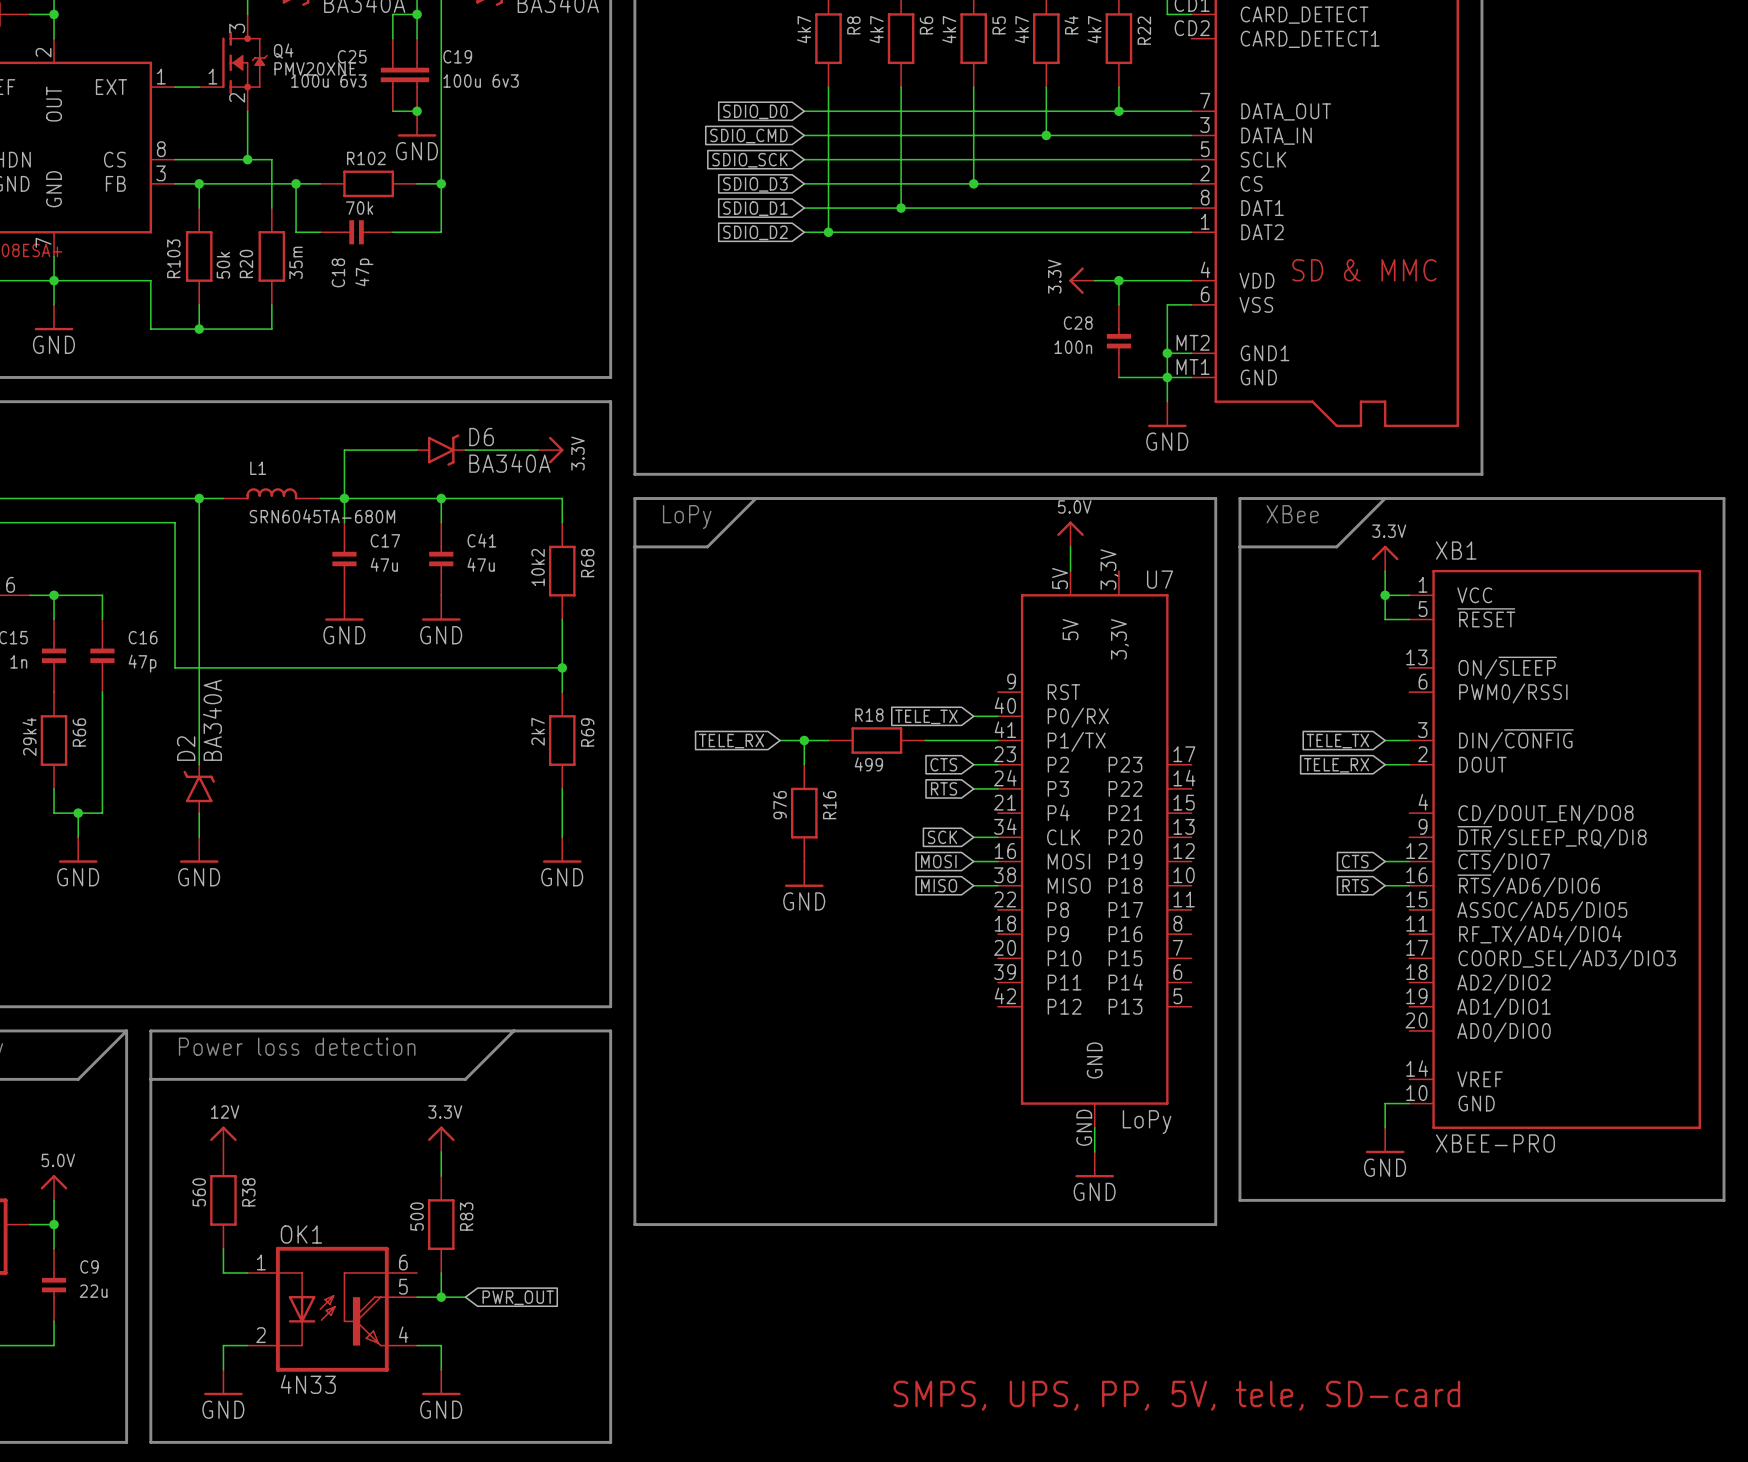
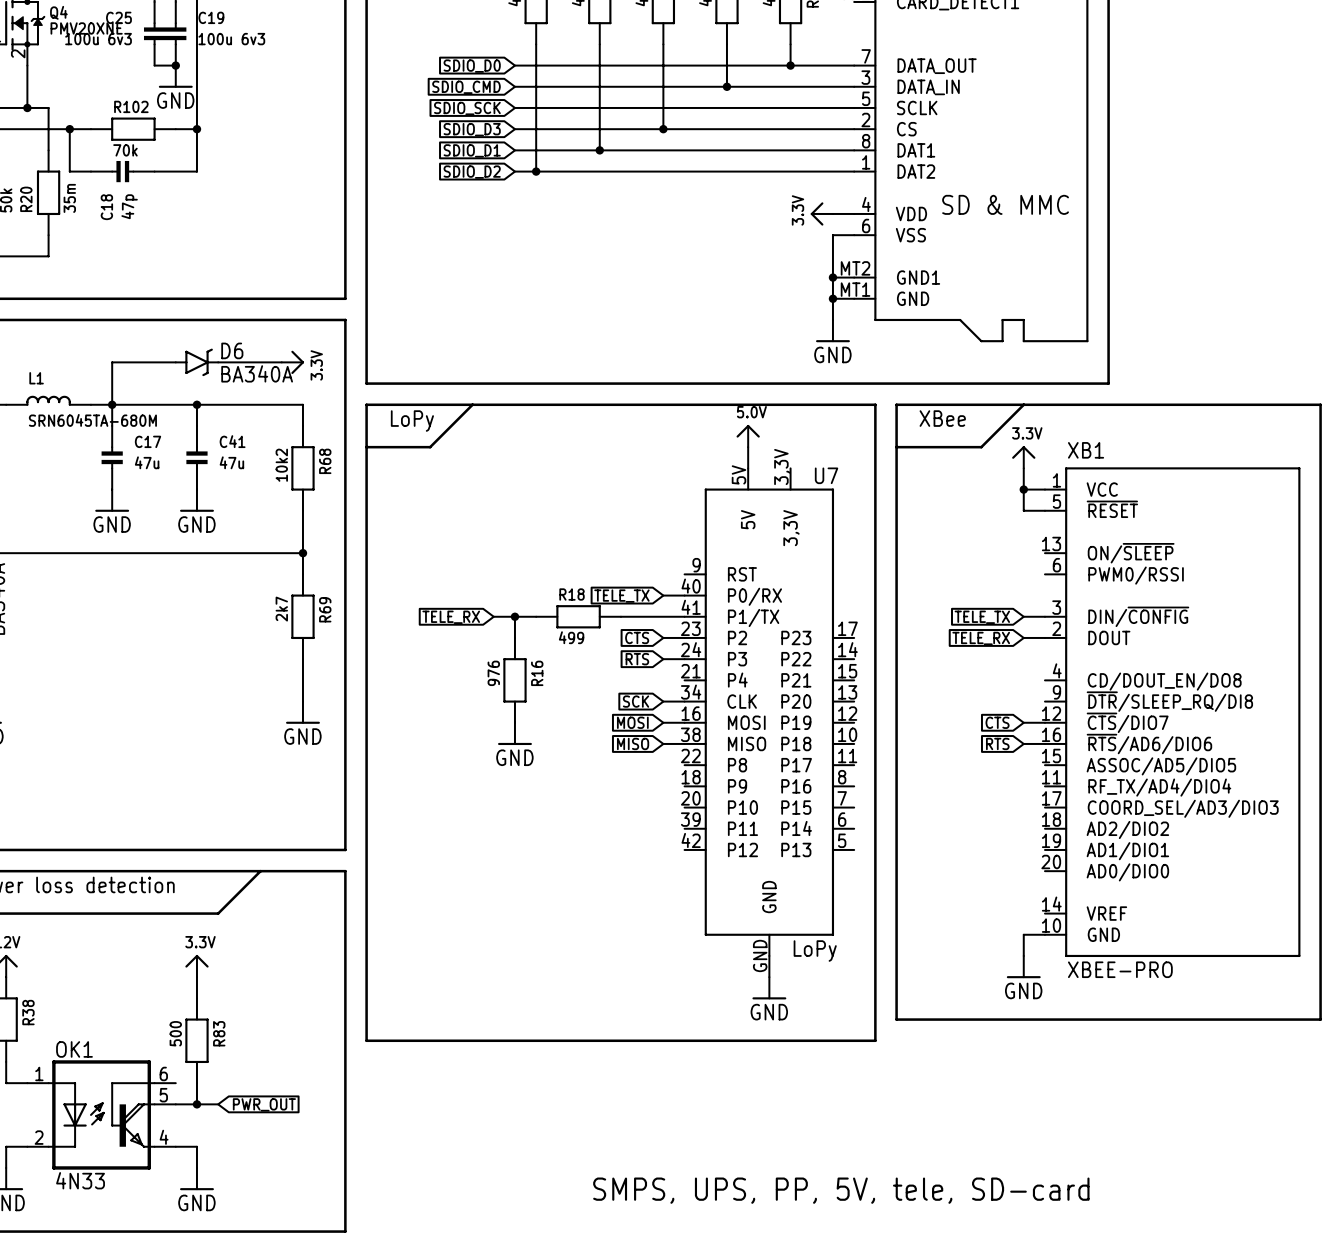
power symbol position: 3.3V (1082, 280) -> 3.3V (821, 213)
wire: (1094, 280) (1167, 280) -> none
wire: (1118, 280) (1118, 304) -> none
junction: (1118, 280) -> none
C28: 100n (1118, 341) -> none
wire: (1118, 377) (1167, 377) -> none

